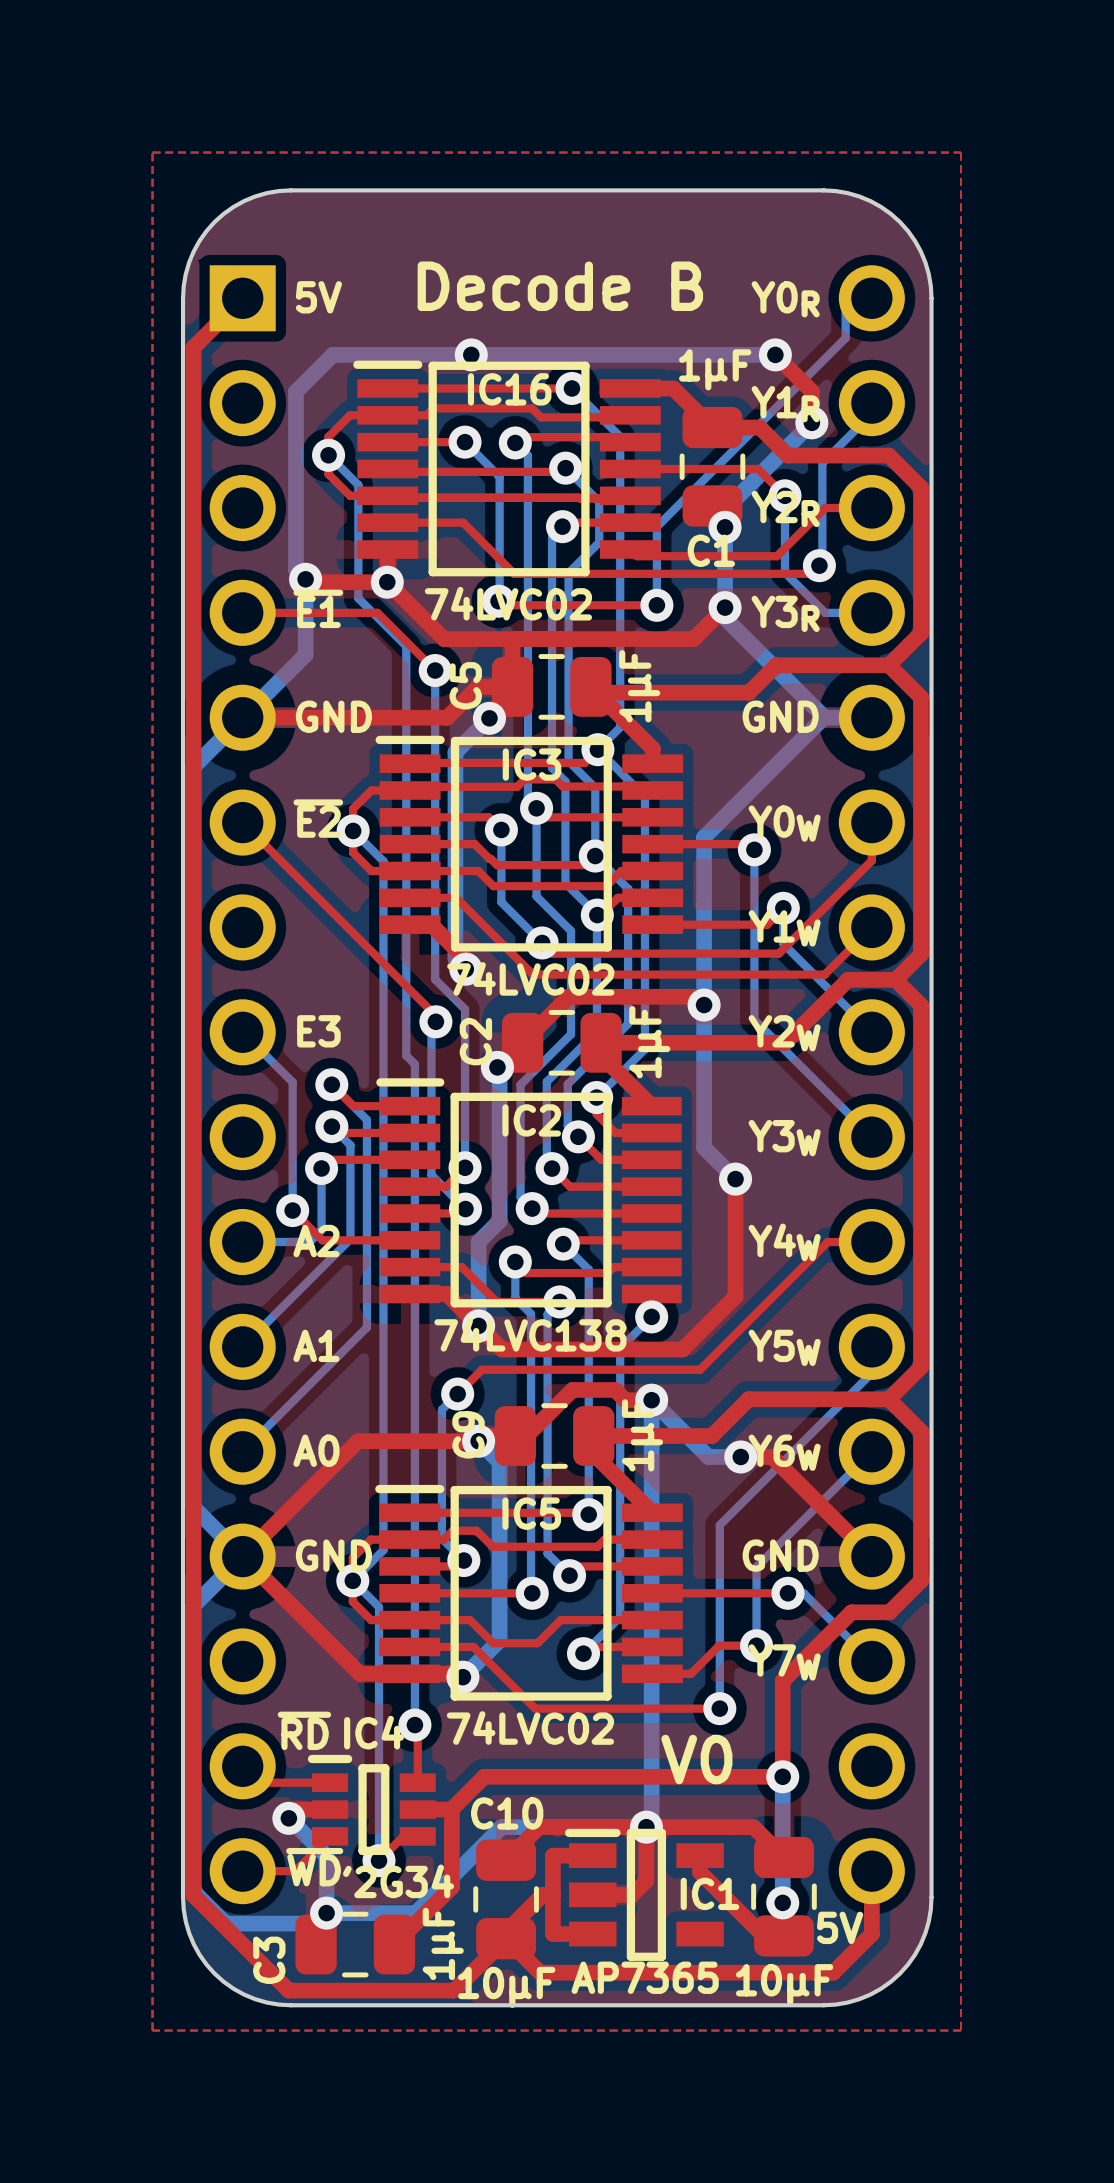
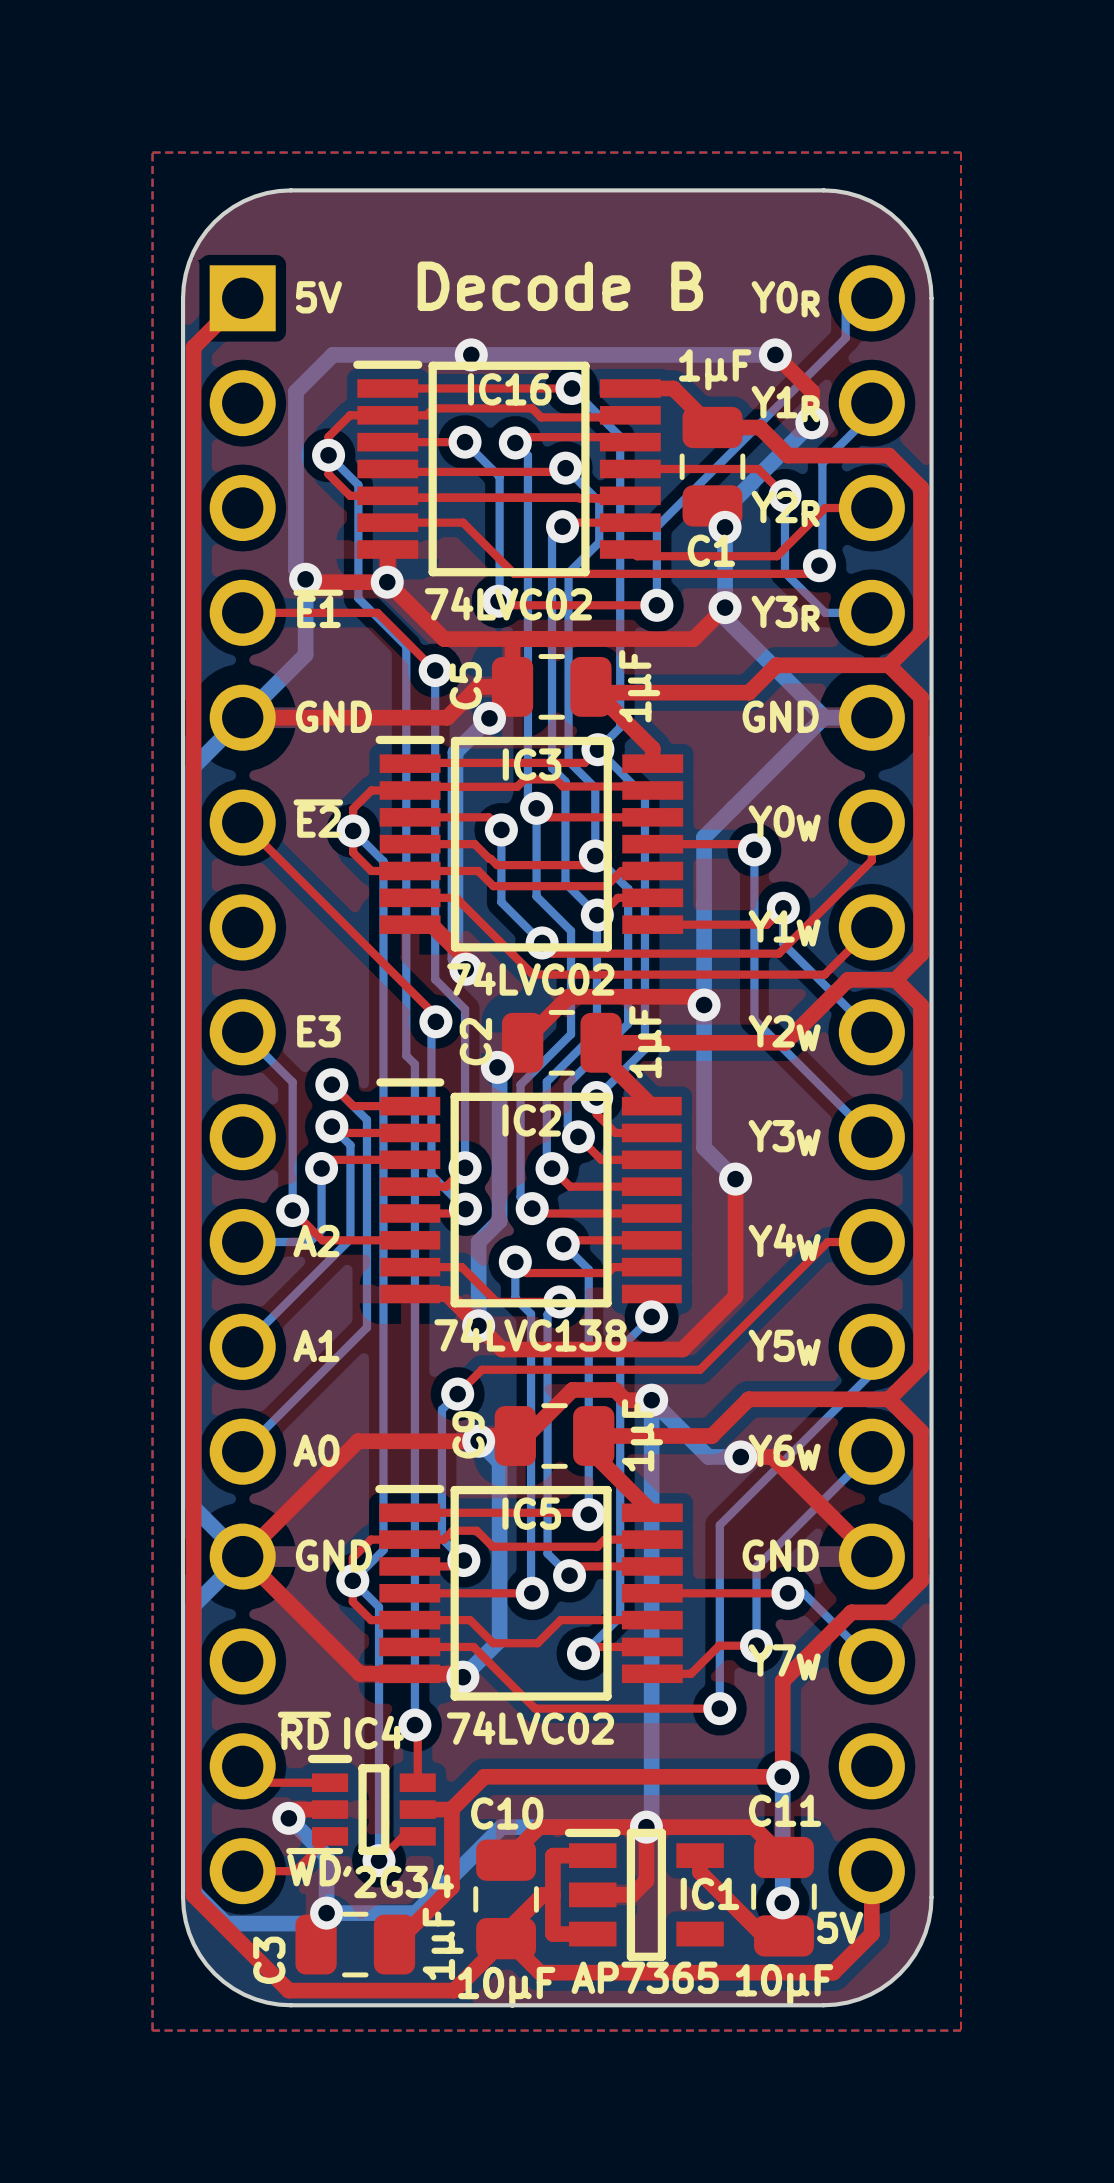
text: V0 (696, 1759) -> none
C11 name: none -> C11 (785, 1810)

